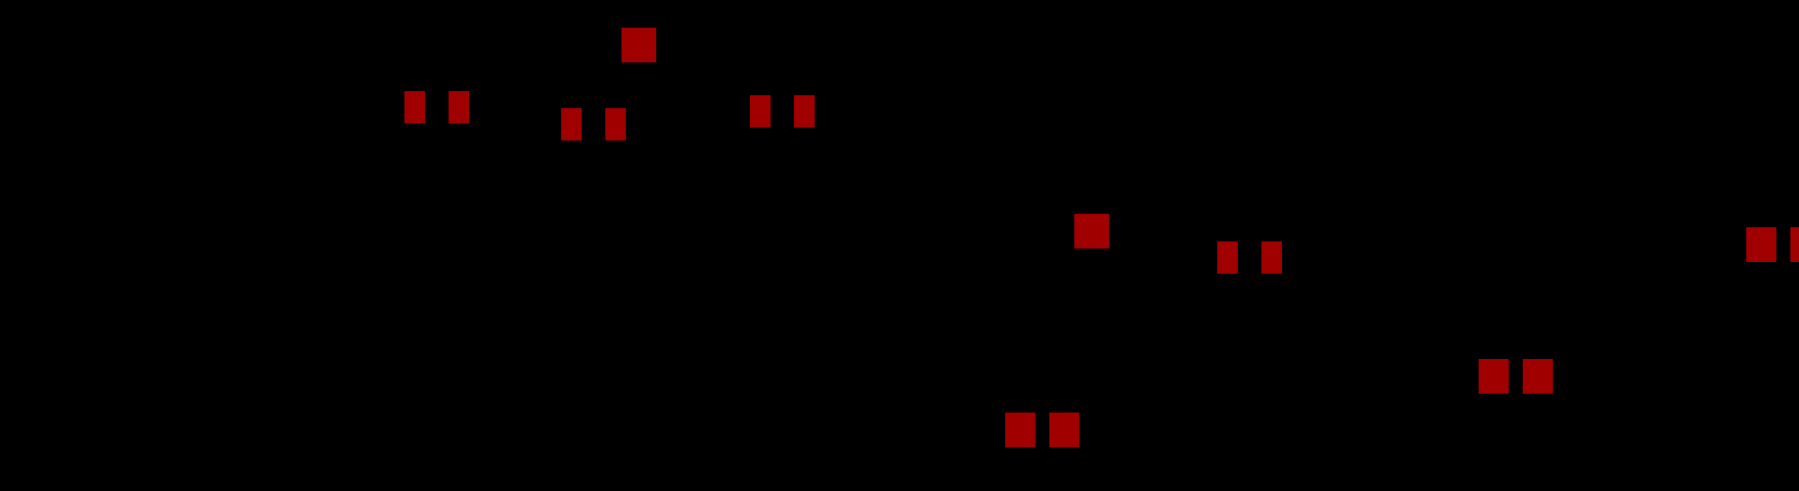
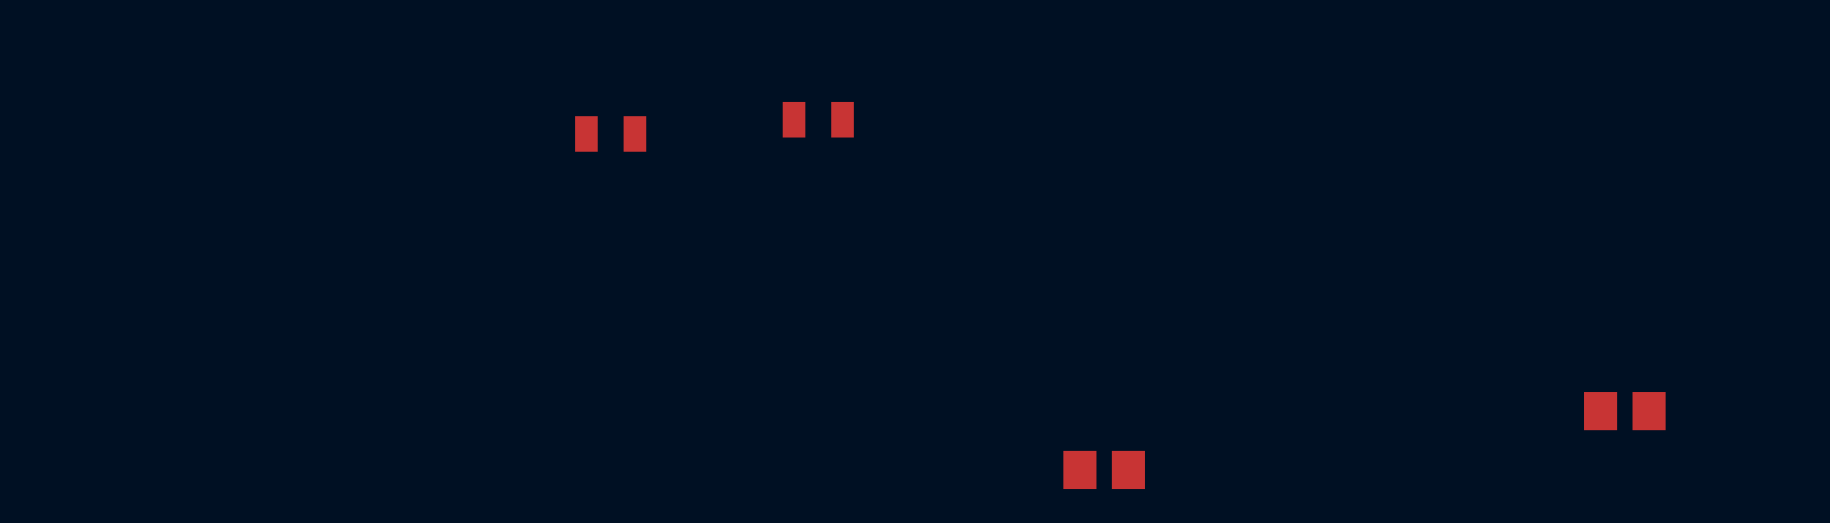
part: (638, 44) -> none
part: (436, 107) -> none
part: (1091, 231) -> none
part: (1249, 257) -> none

